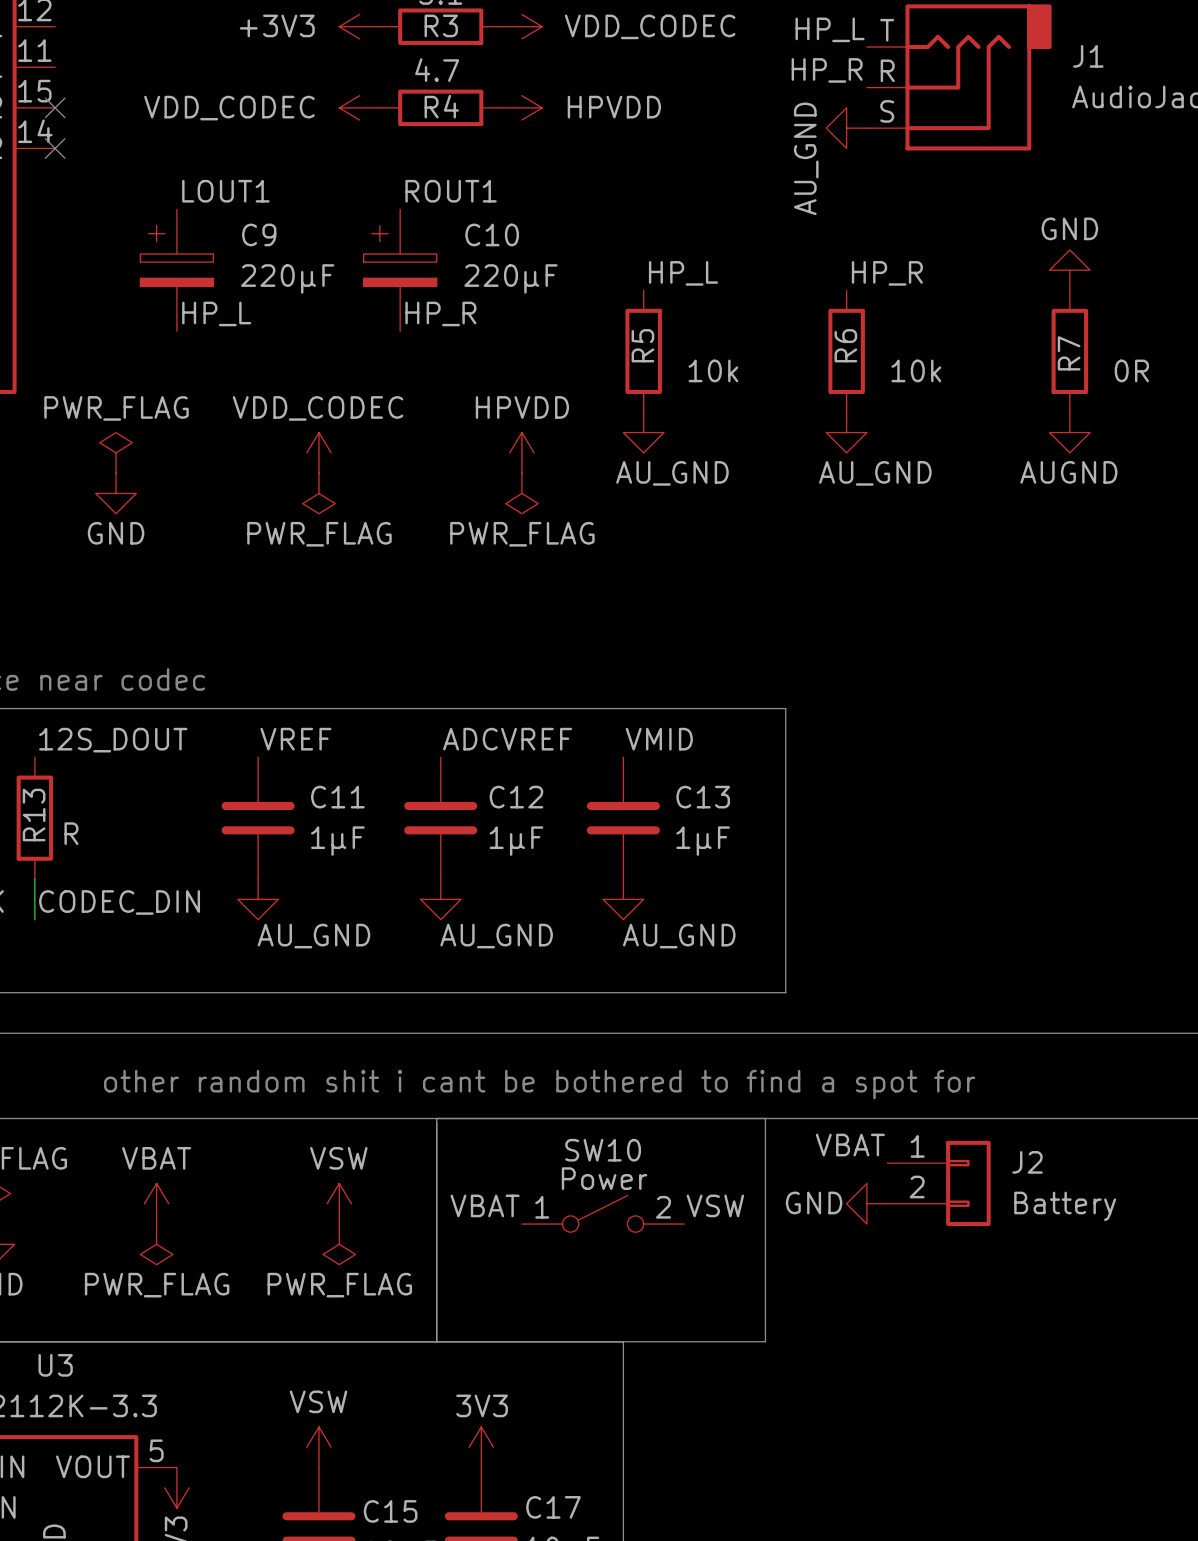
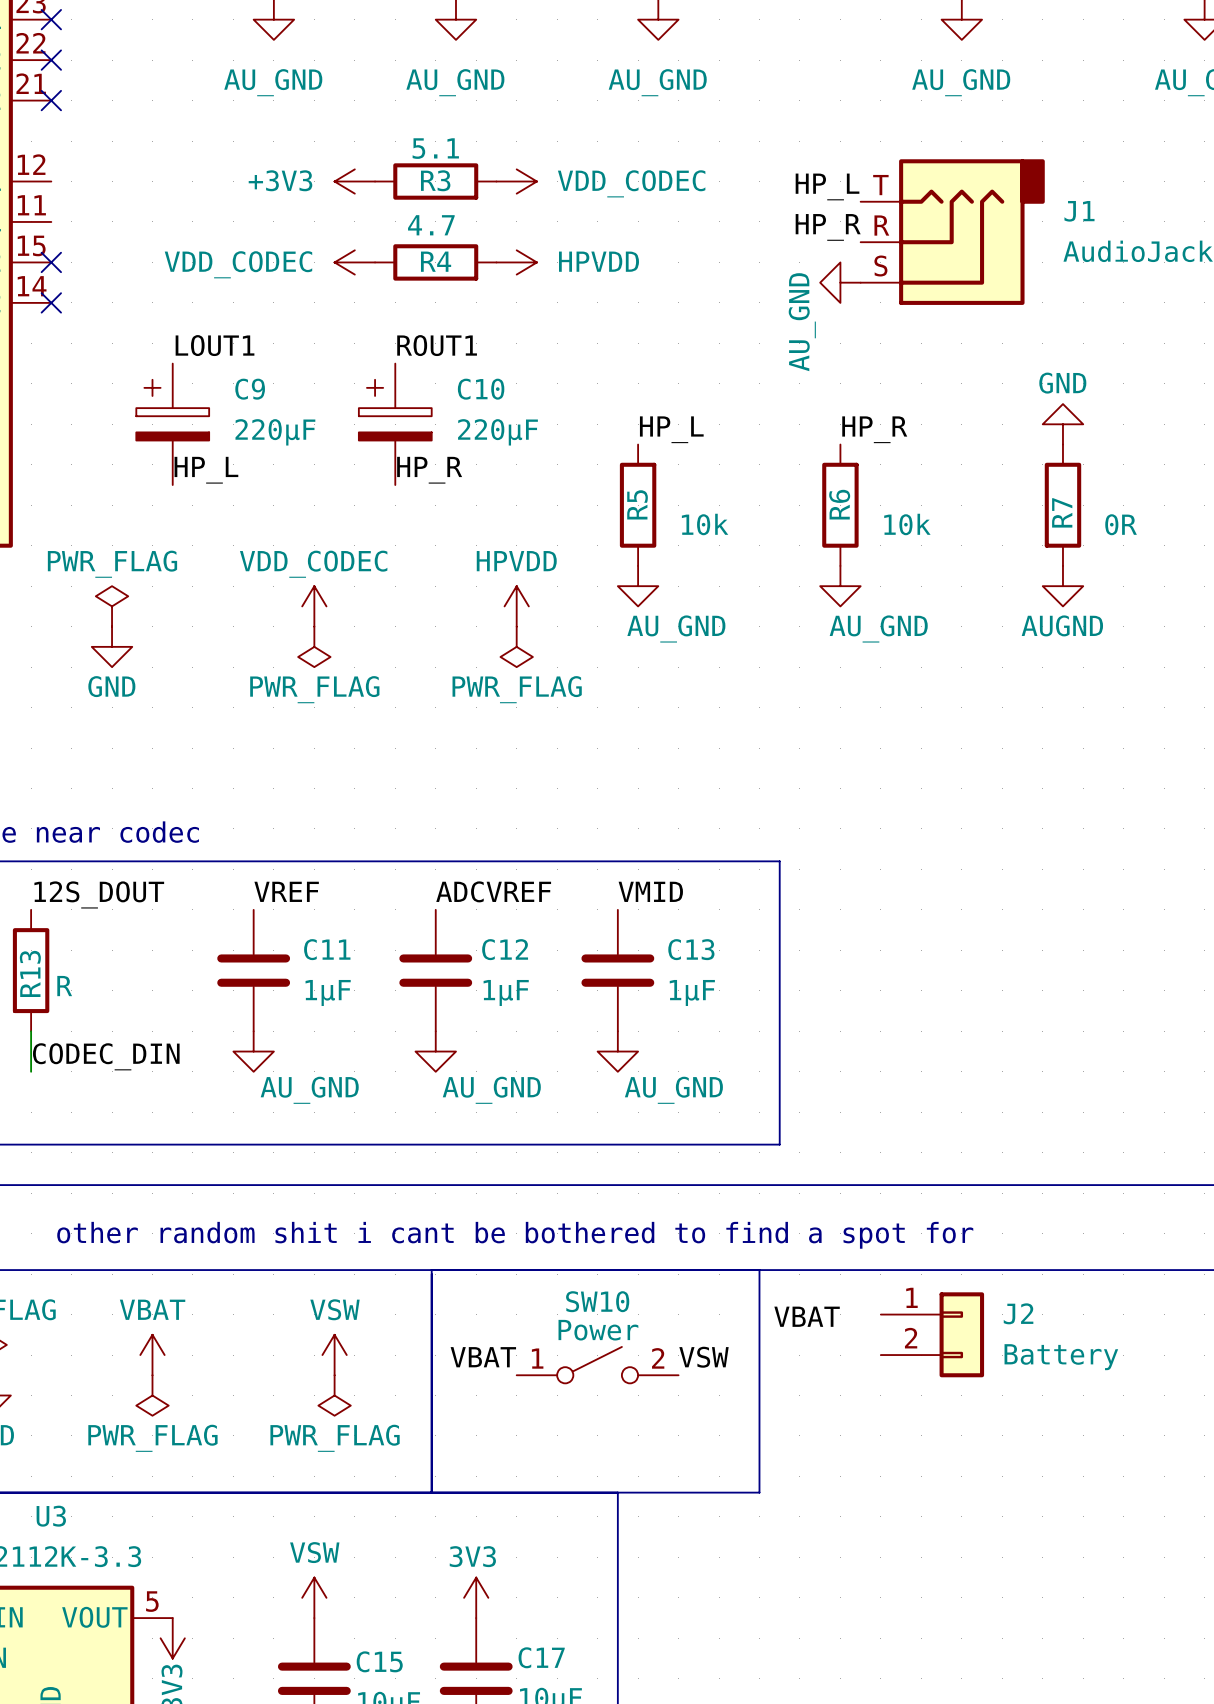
text position: other random shit i cant be bothered to find a spot for (539, 1084) -> other random shit i cant be bothered to find a spot for (515, 1235)
label position: VBAT (850, 1145) -> VBAT (807, 1316)
power symbol: GND (866, 1203) -> none

